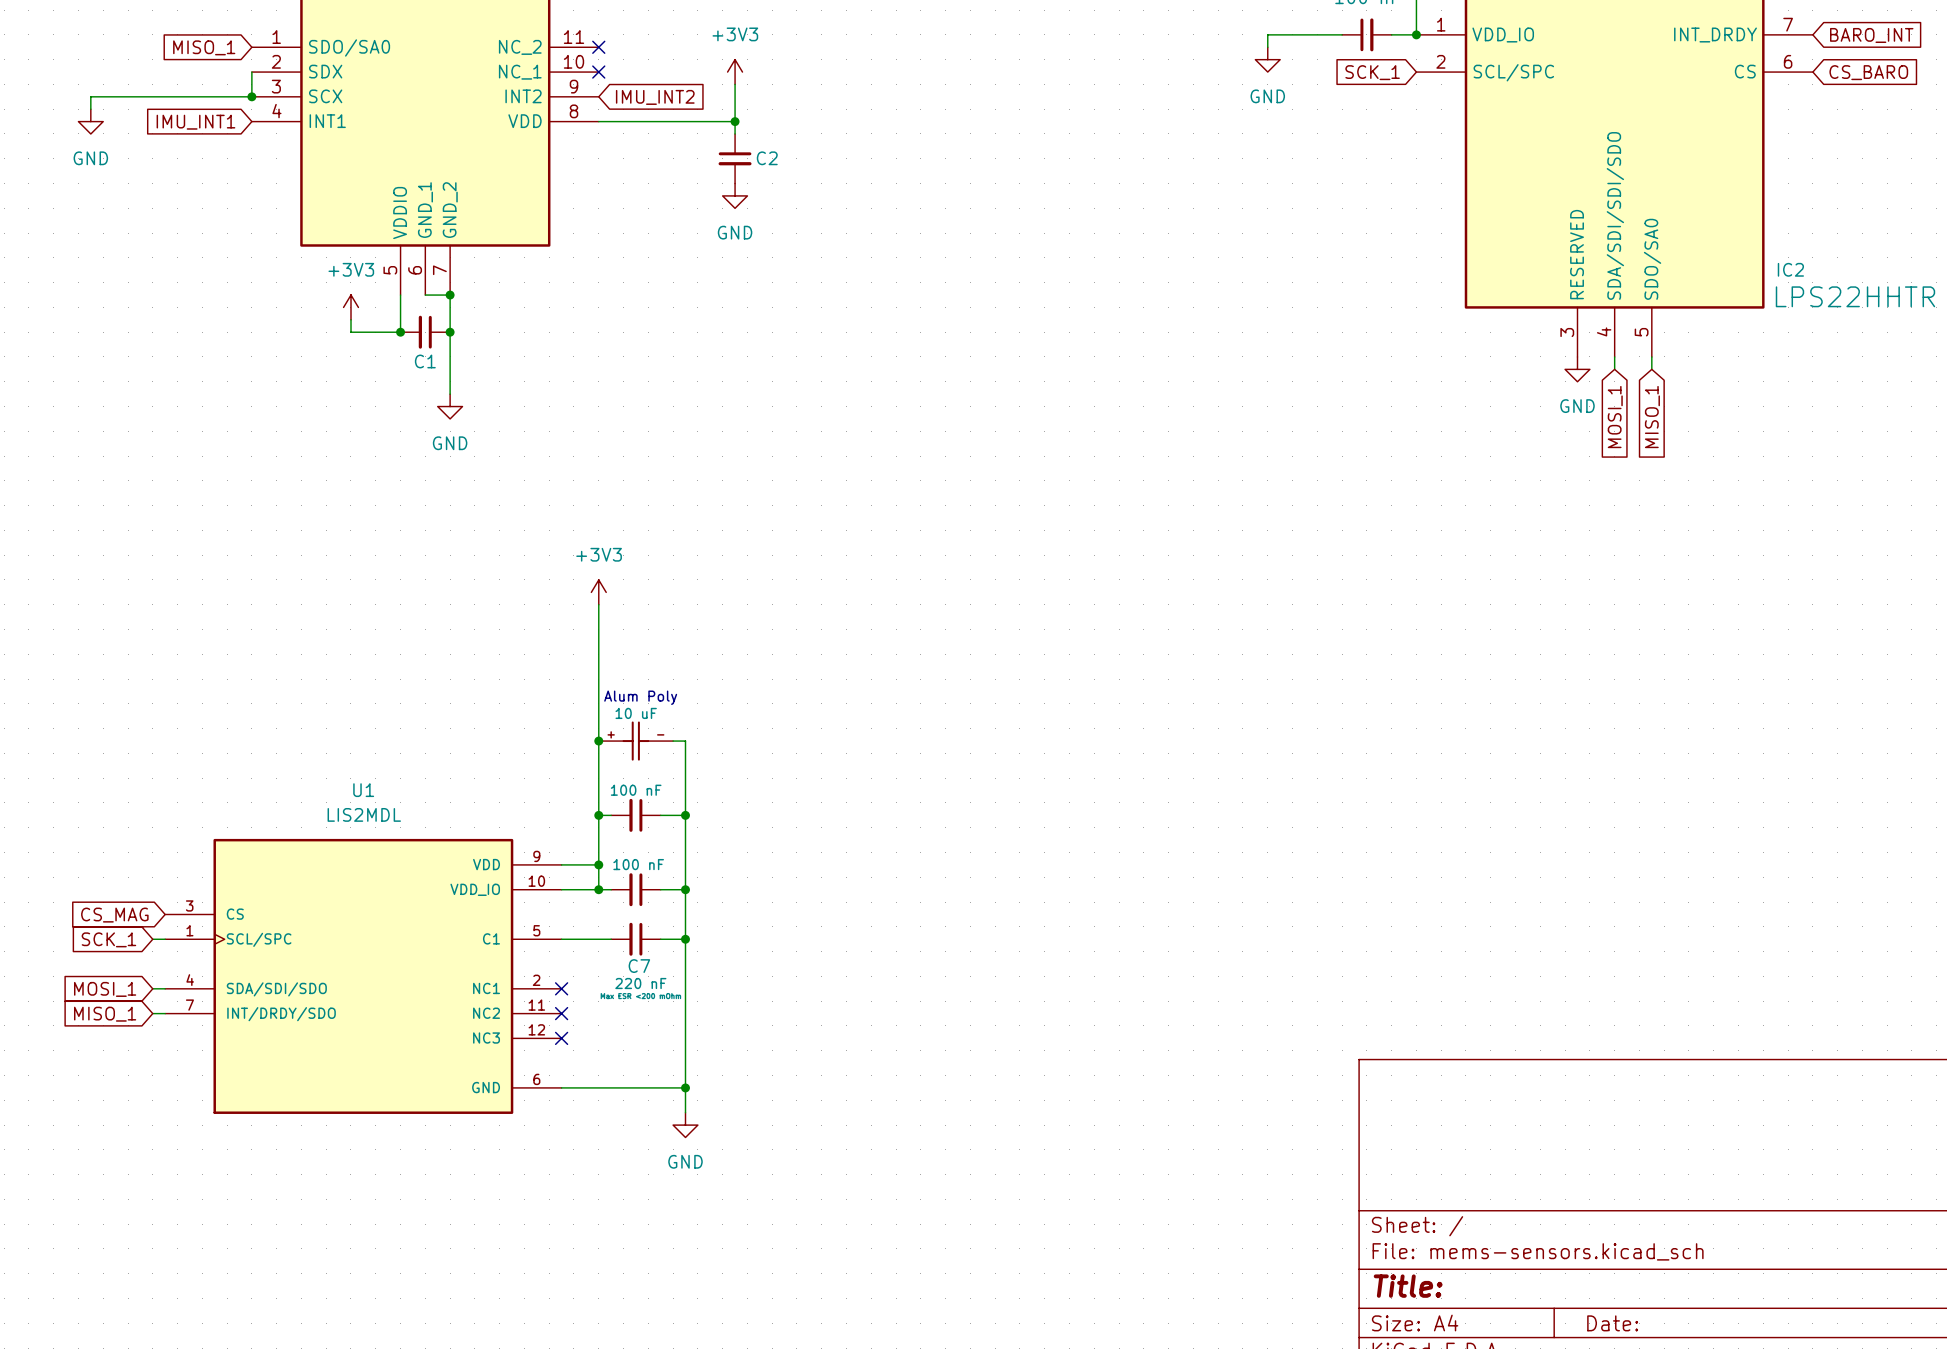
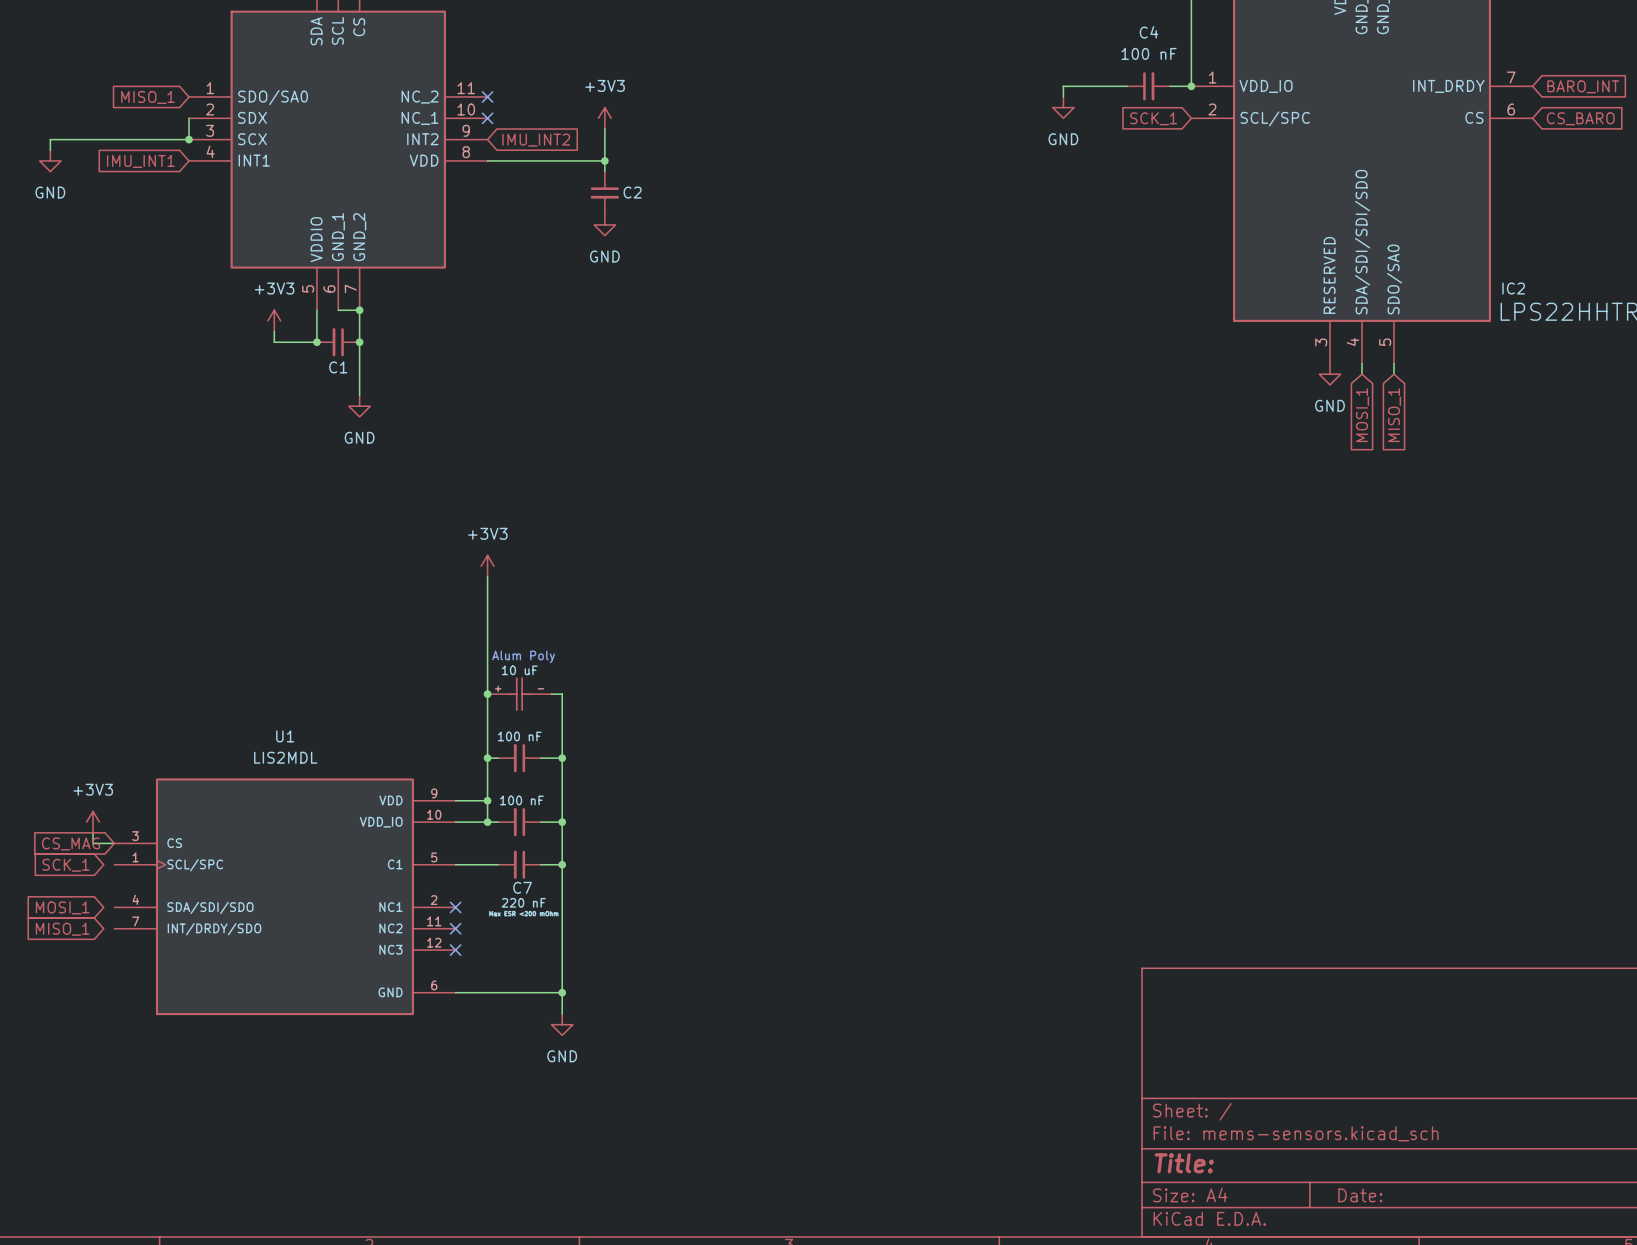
power symbol: none -> +3V3 (93, 822)
wire: none -> (93, 832) (93, 843) (114, 843)
wire: (152, 939) (165, 939) -> none
wire: (152, 988) (165, 988) -> none
wire: (152, 1013) (165, 1013) -> none

